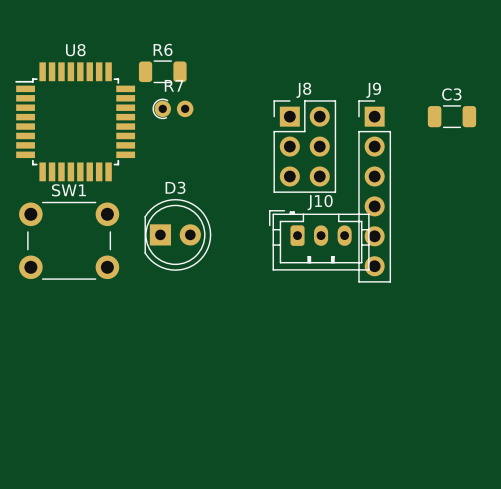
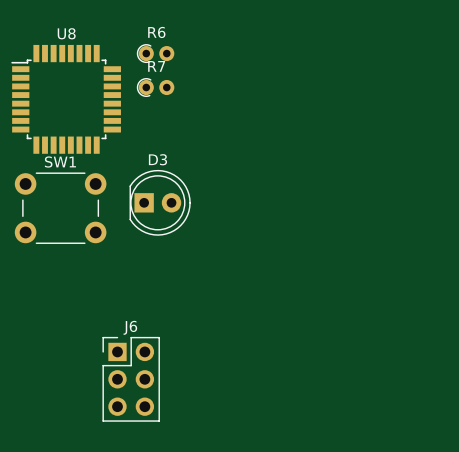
R6 footprint: [138, 60, 187, 84] -> [136, 44, 175, 63]
C3: (451, 116) -> none
J8: (304, 146) -> none
J9: (374, 191) -> none
J10: (319, 240) -> none
J6: none -> (131, 379)

